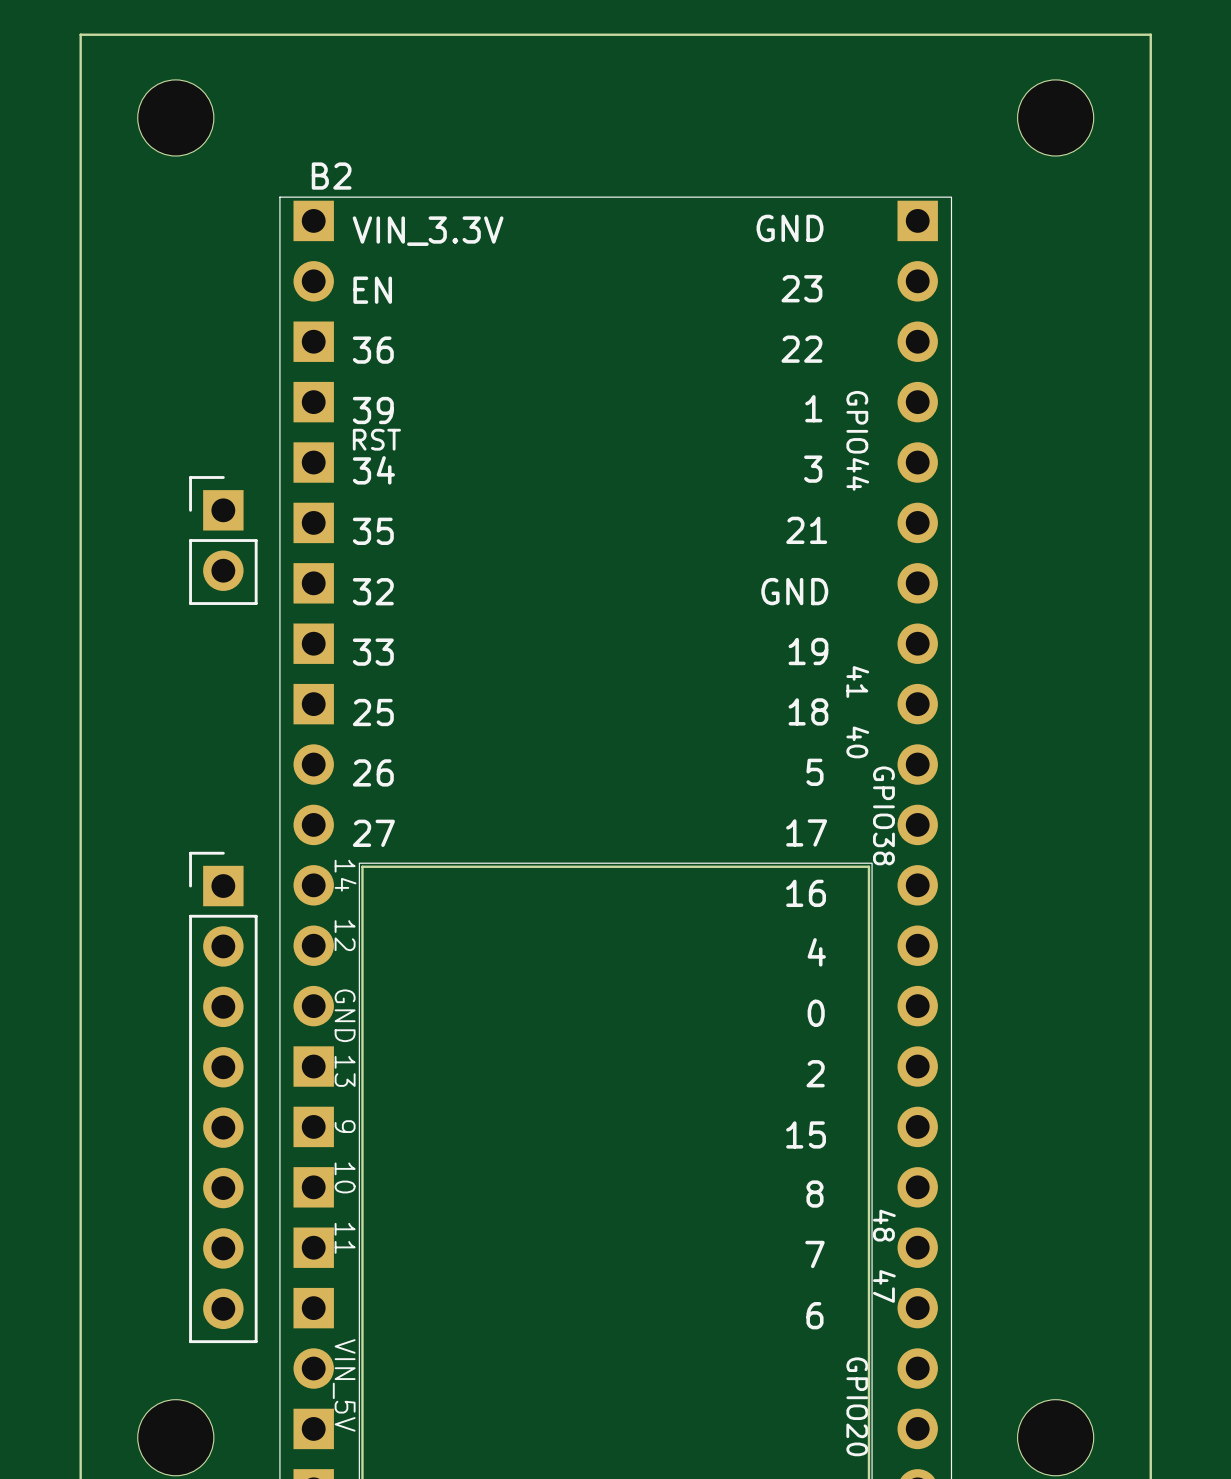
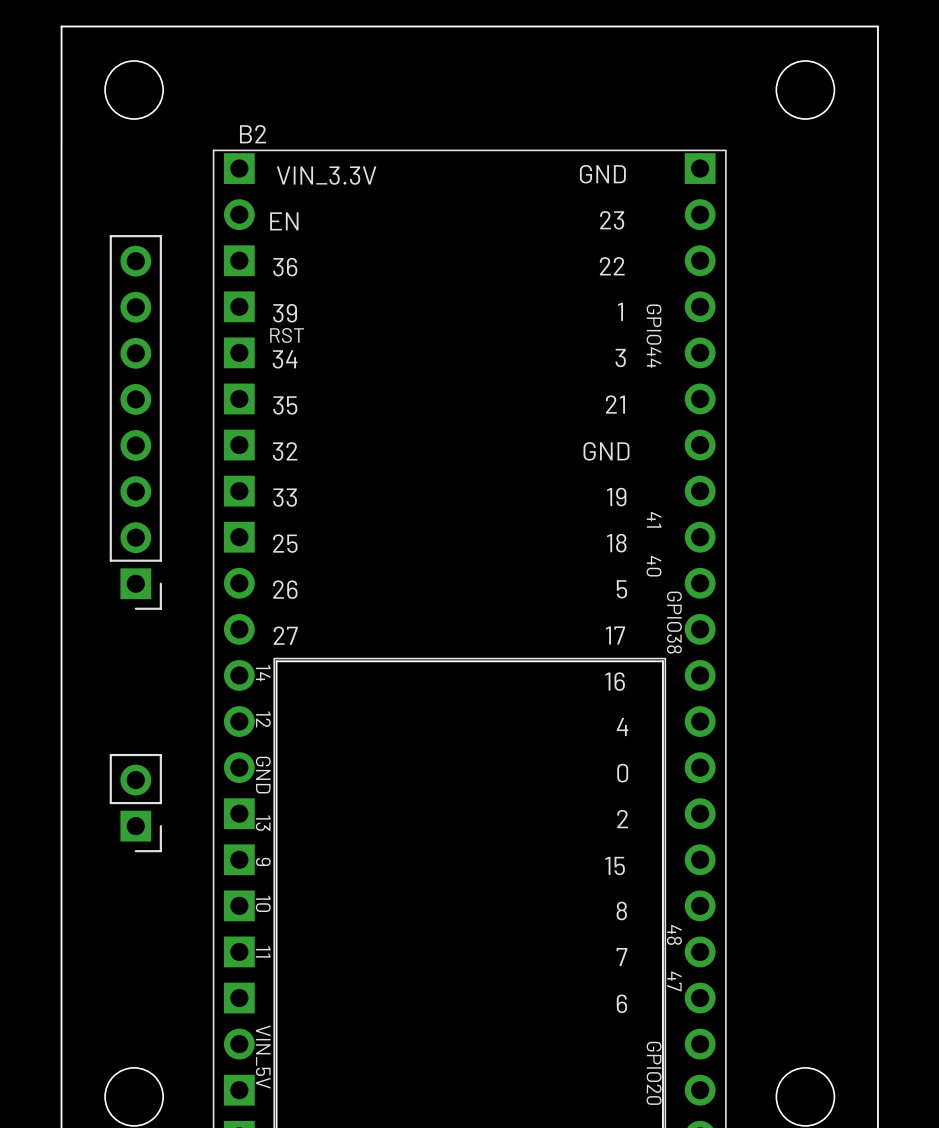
part rotation: 0° (223, 540) -> 180° (135, 803)
part position: (223, 540) -> (135, 803)
part rotation: 0° (223, 1097) -> 180° (135, 422)
part position: (223, 1097) -> (135, 422)

